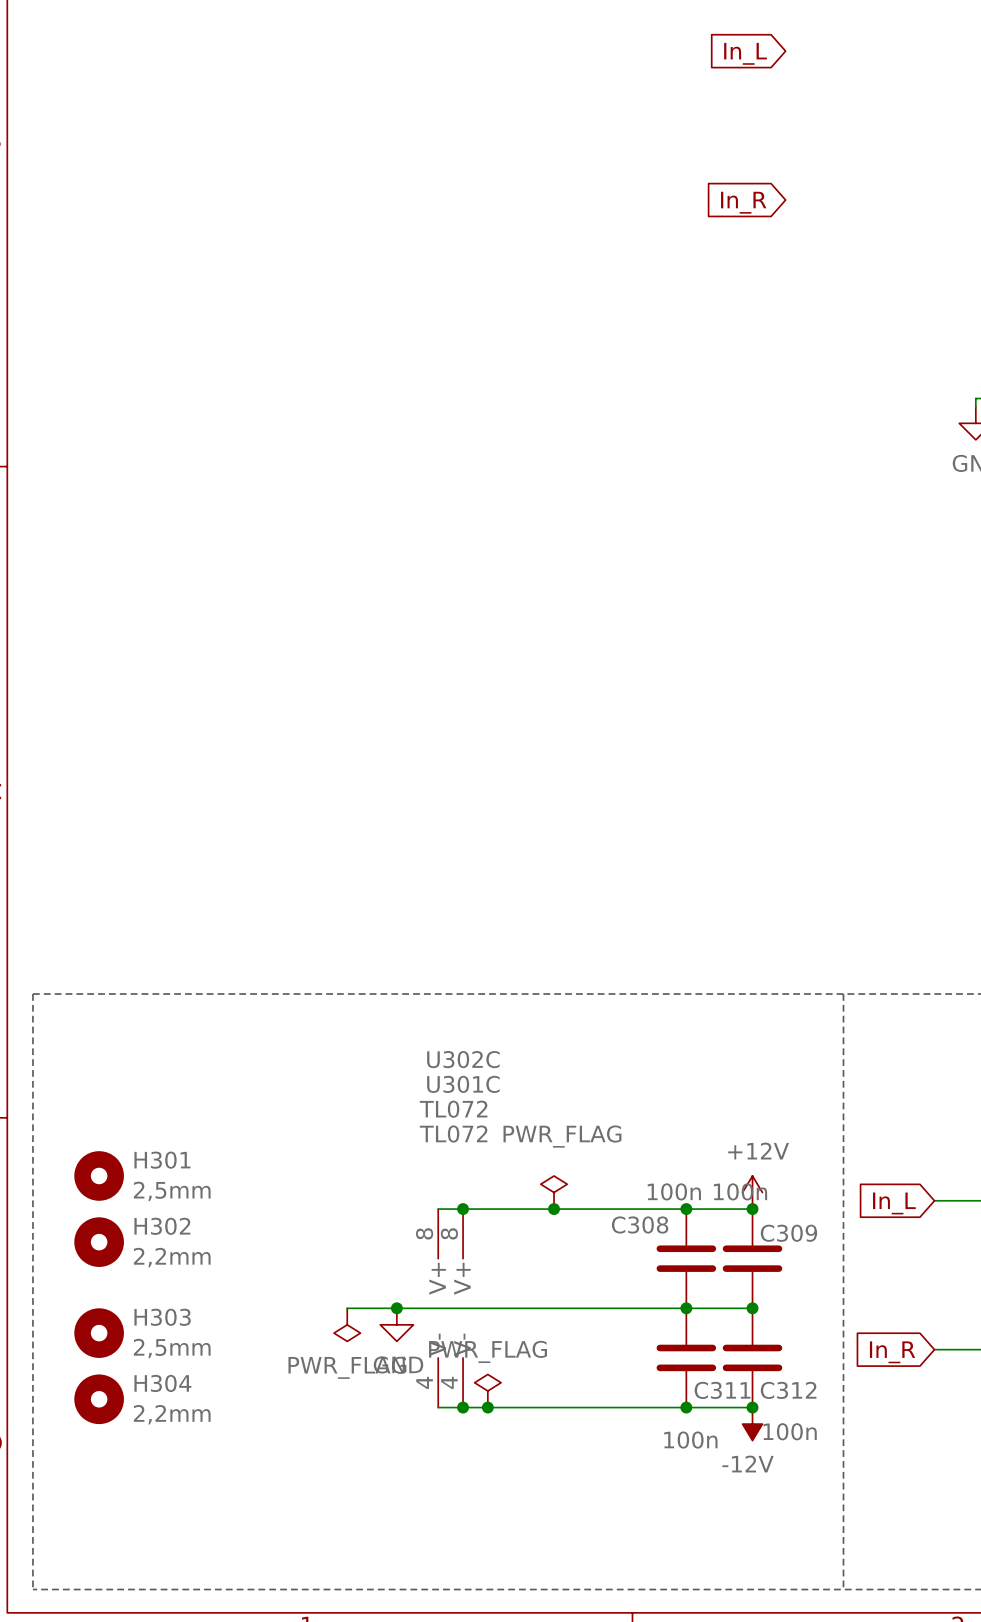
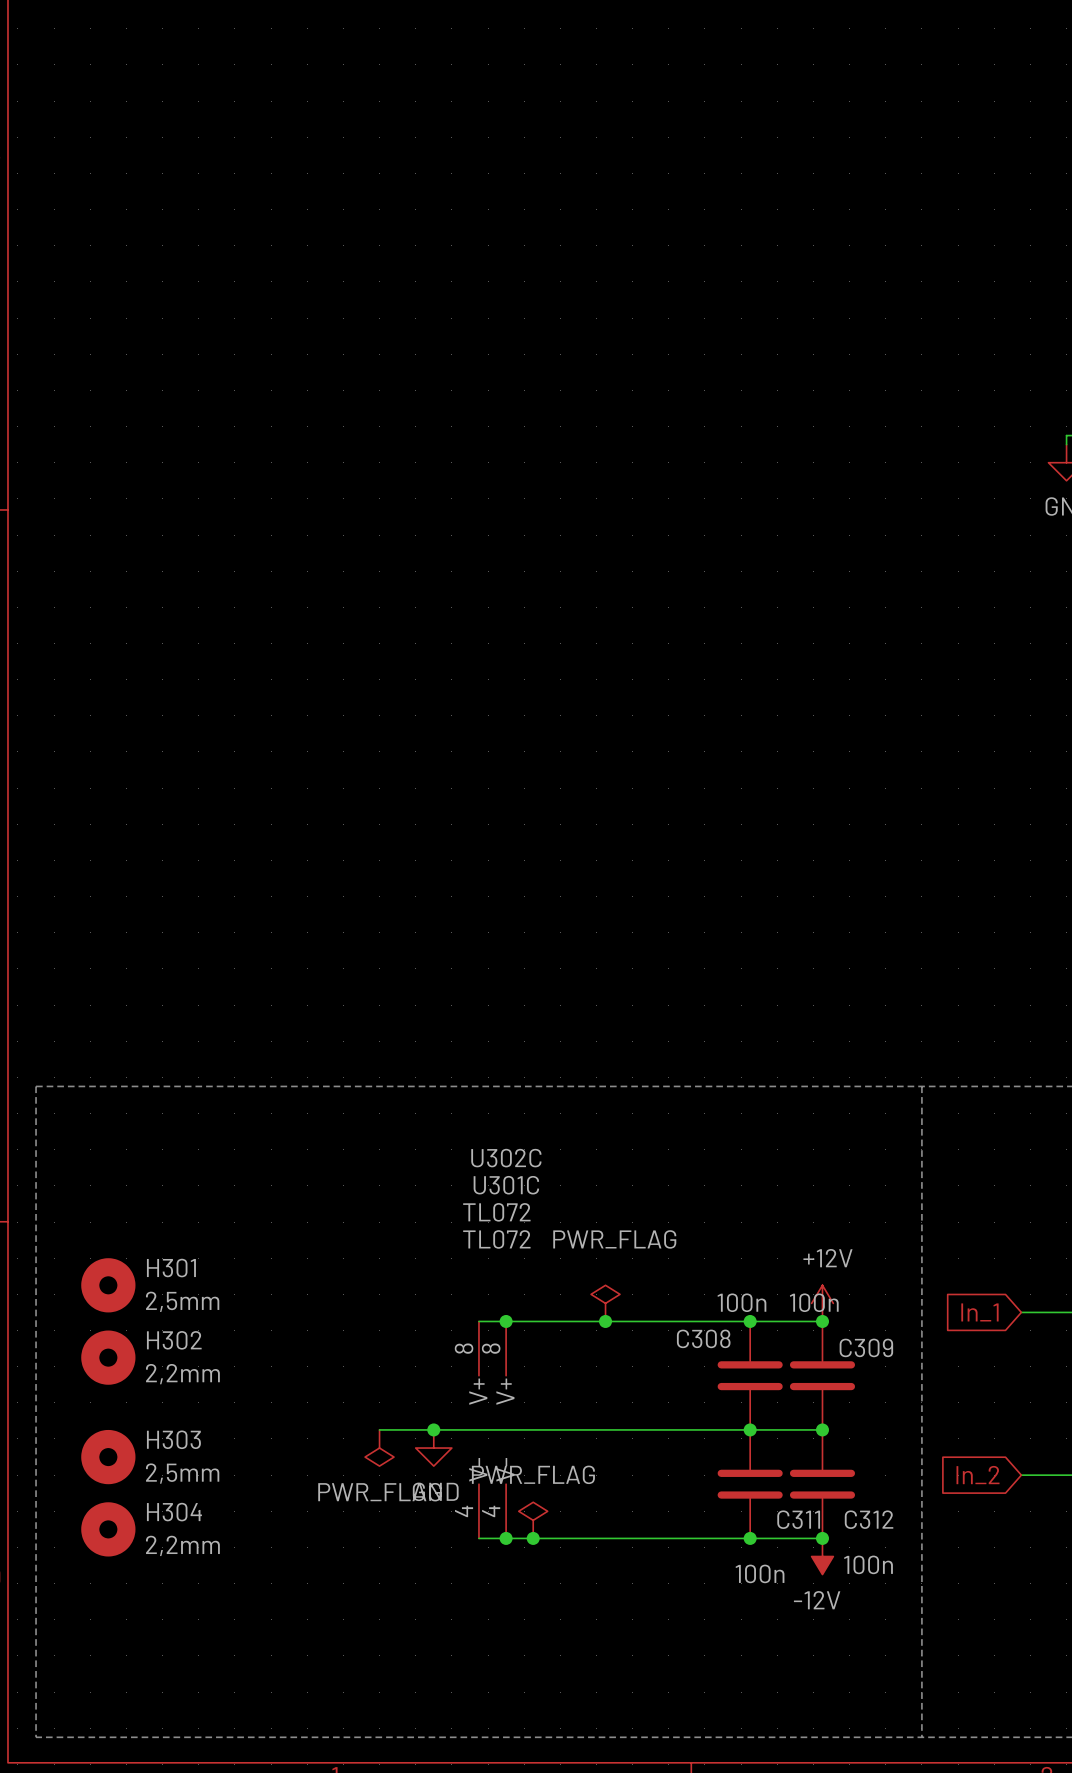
global label: In_L (745, 53) -> none
global label: In_R (743, 202) -> none
global label: In_L (894, 1203) -> In_1 (979, 1312)
global label: In_R (892, 1352) -> In_2 (978, 1475)

